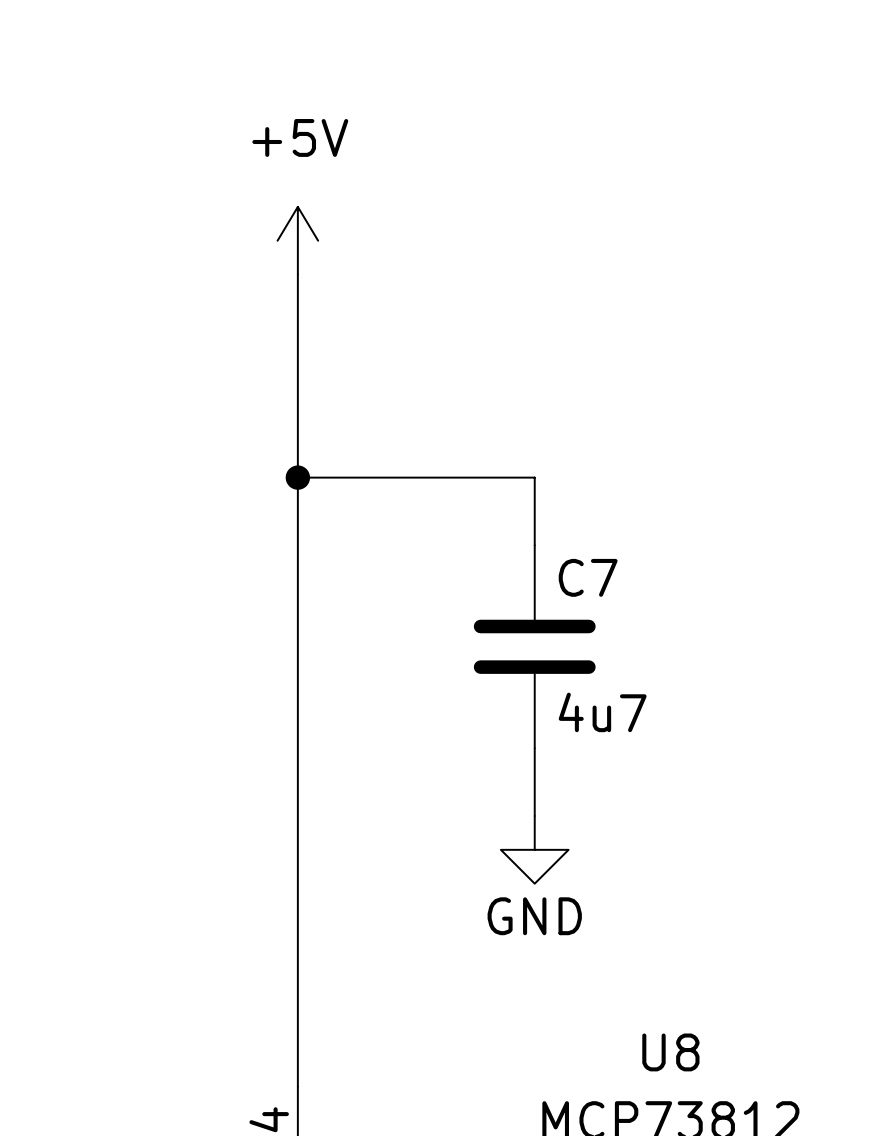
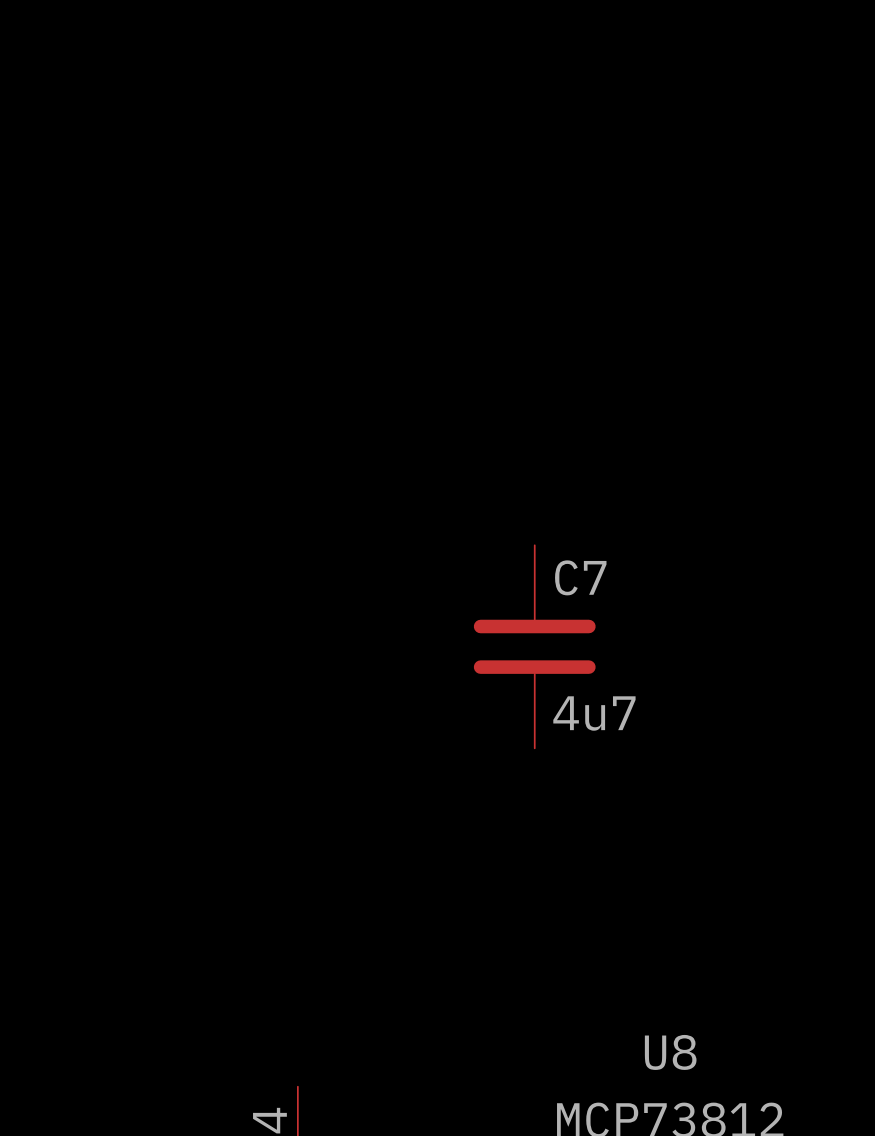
power symbol: +5V (297, 240) -> none
wire: (297, 274) (297, 1086) -> none
wire: (297, 477) (534, 477) (534, 545) -> none
junction: (297, 477) -> none
wire: (534, 748) (534, 816) -> none
power symbol: GND (534, 849) -> none

